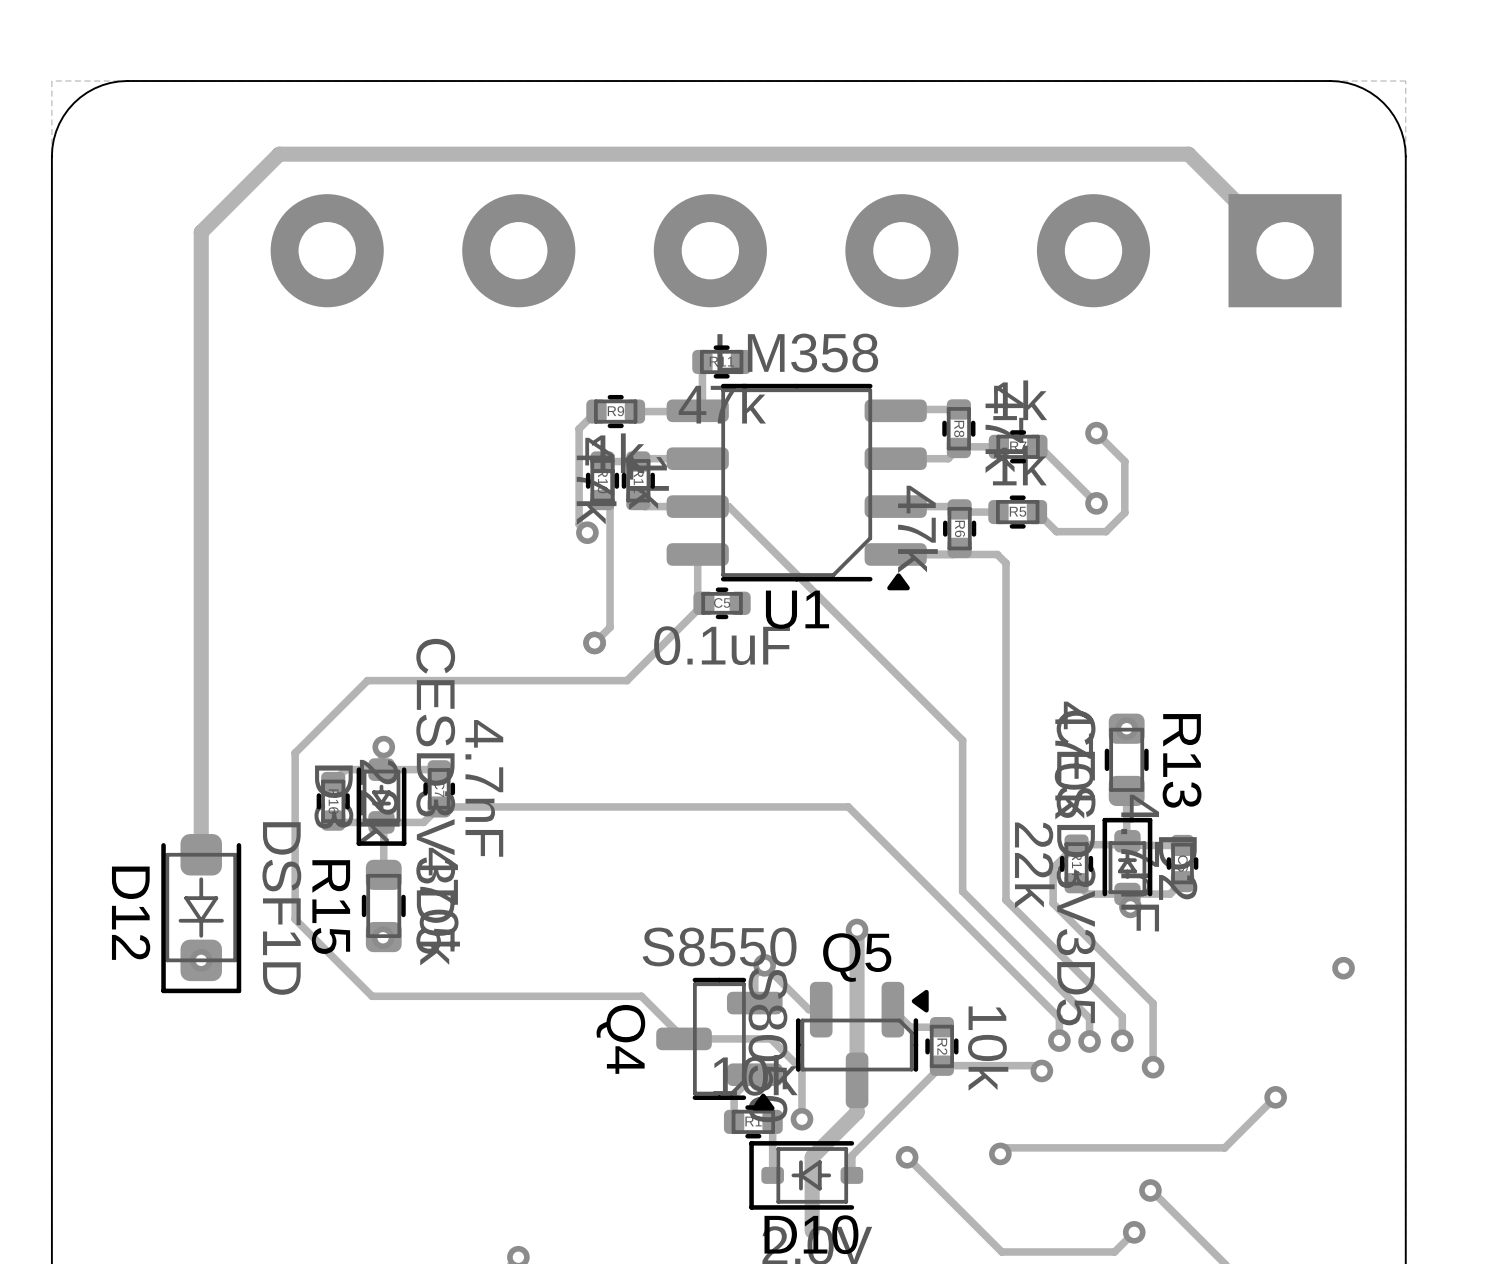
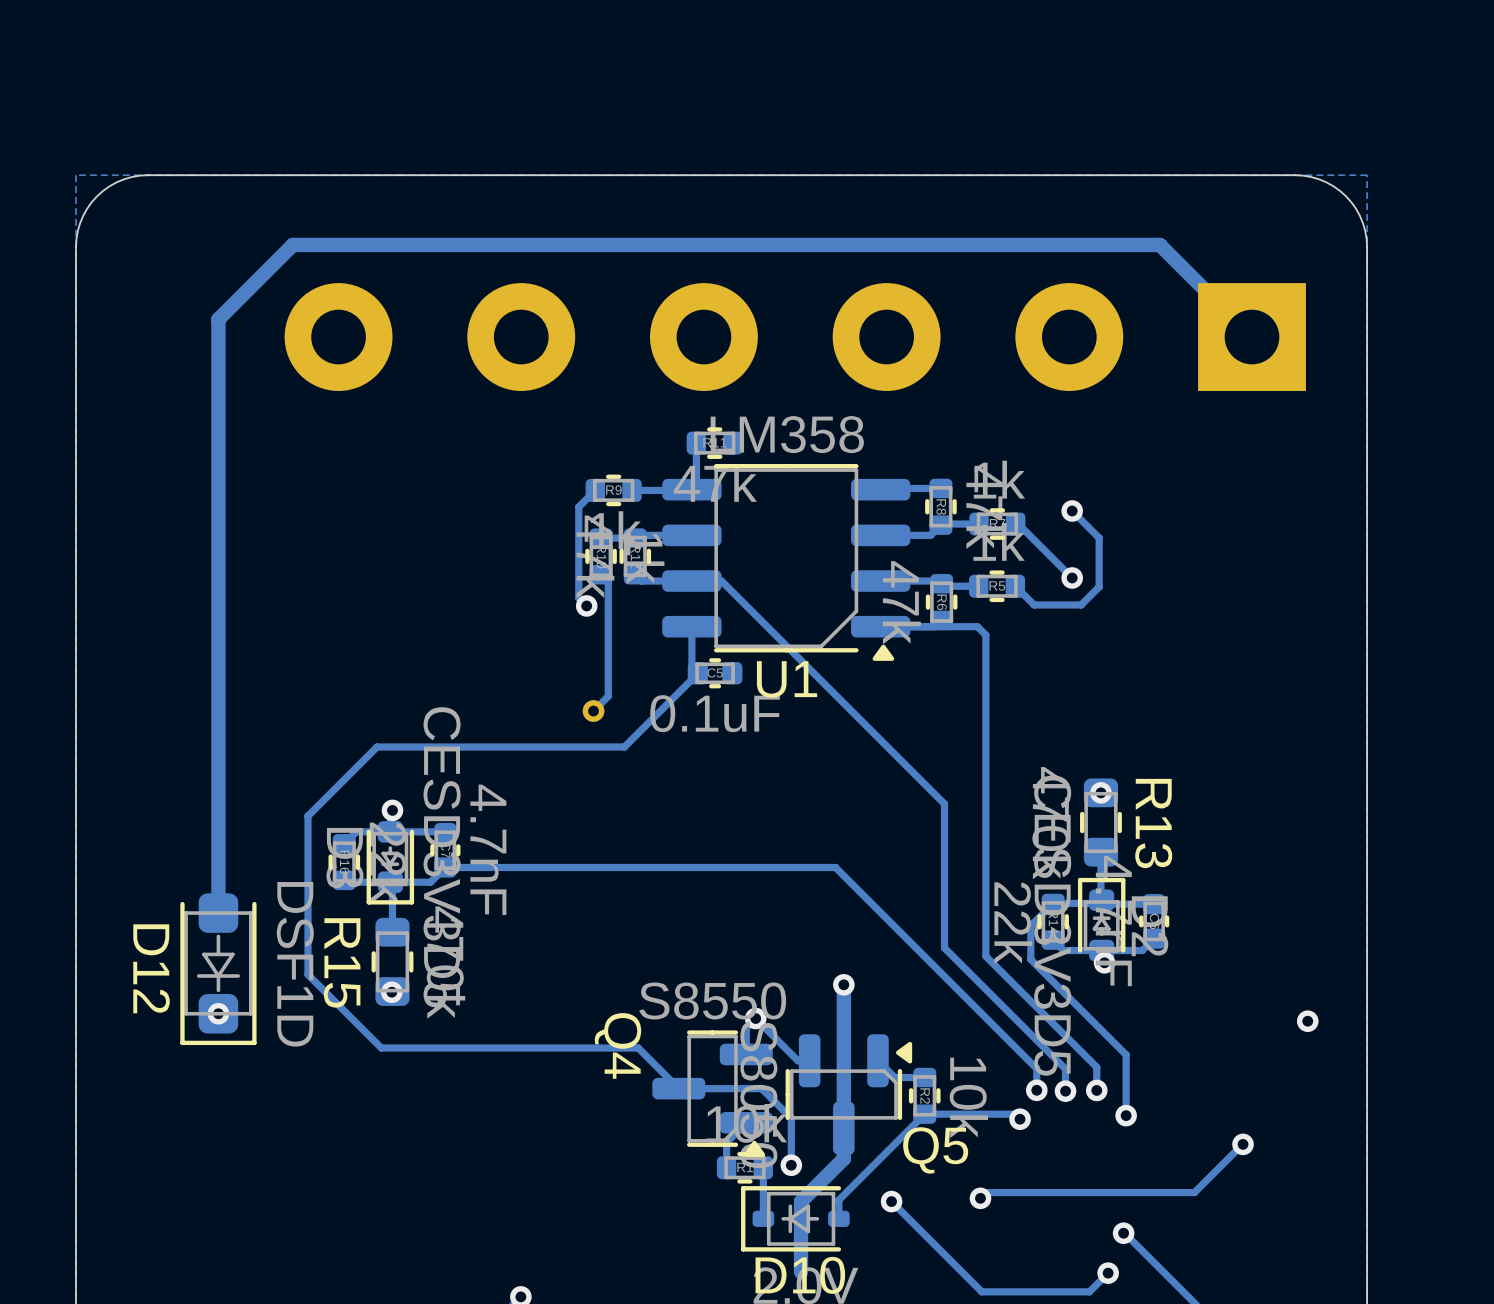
Q5 name position: Q5 (857, 957) -> Q5 (935, 1150)
Q4 name position: Q4 (620, 1039) -> Q4 (617, 1045)

